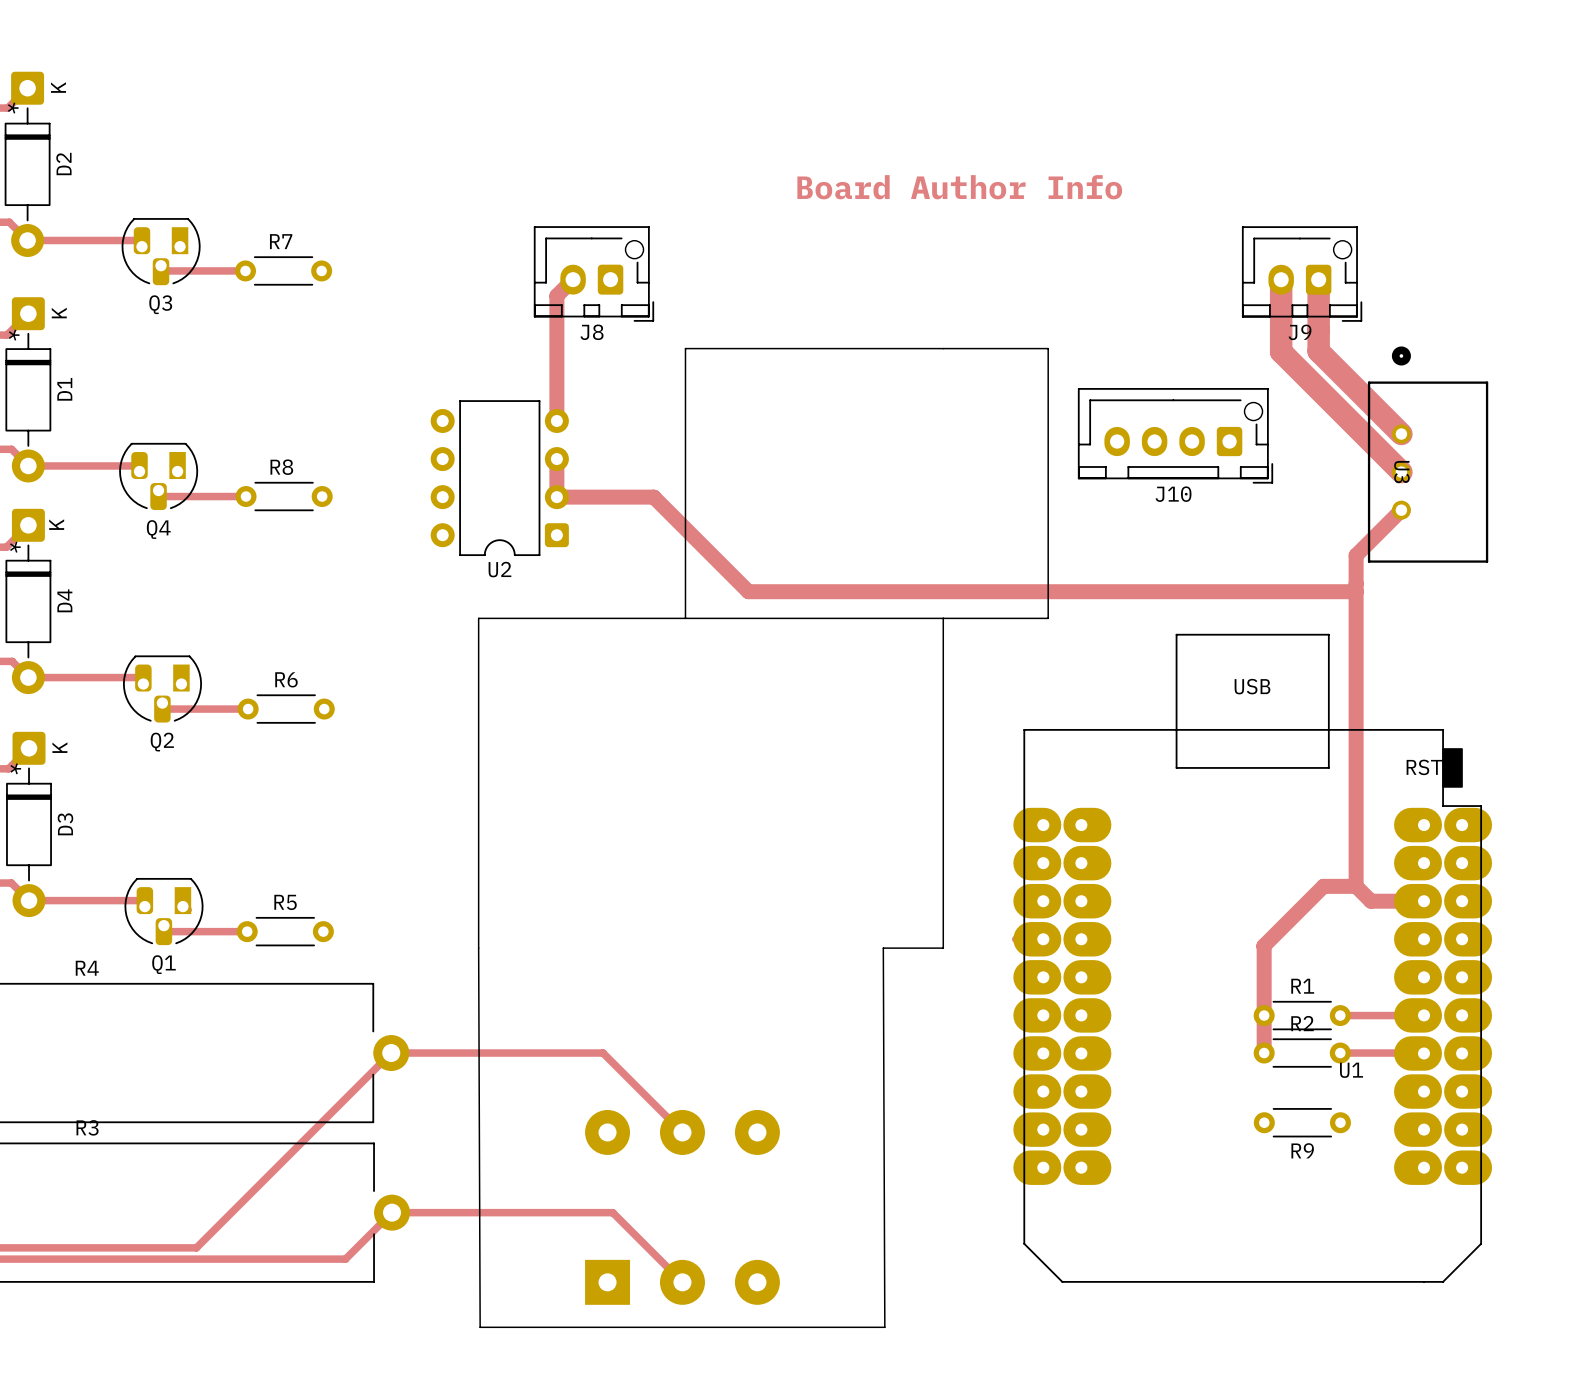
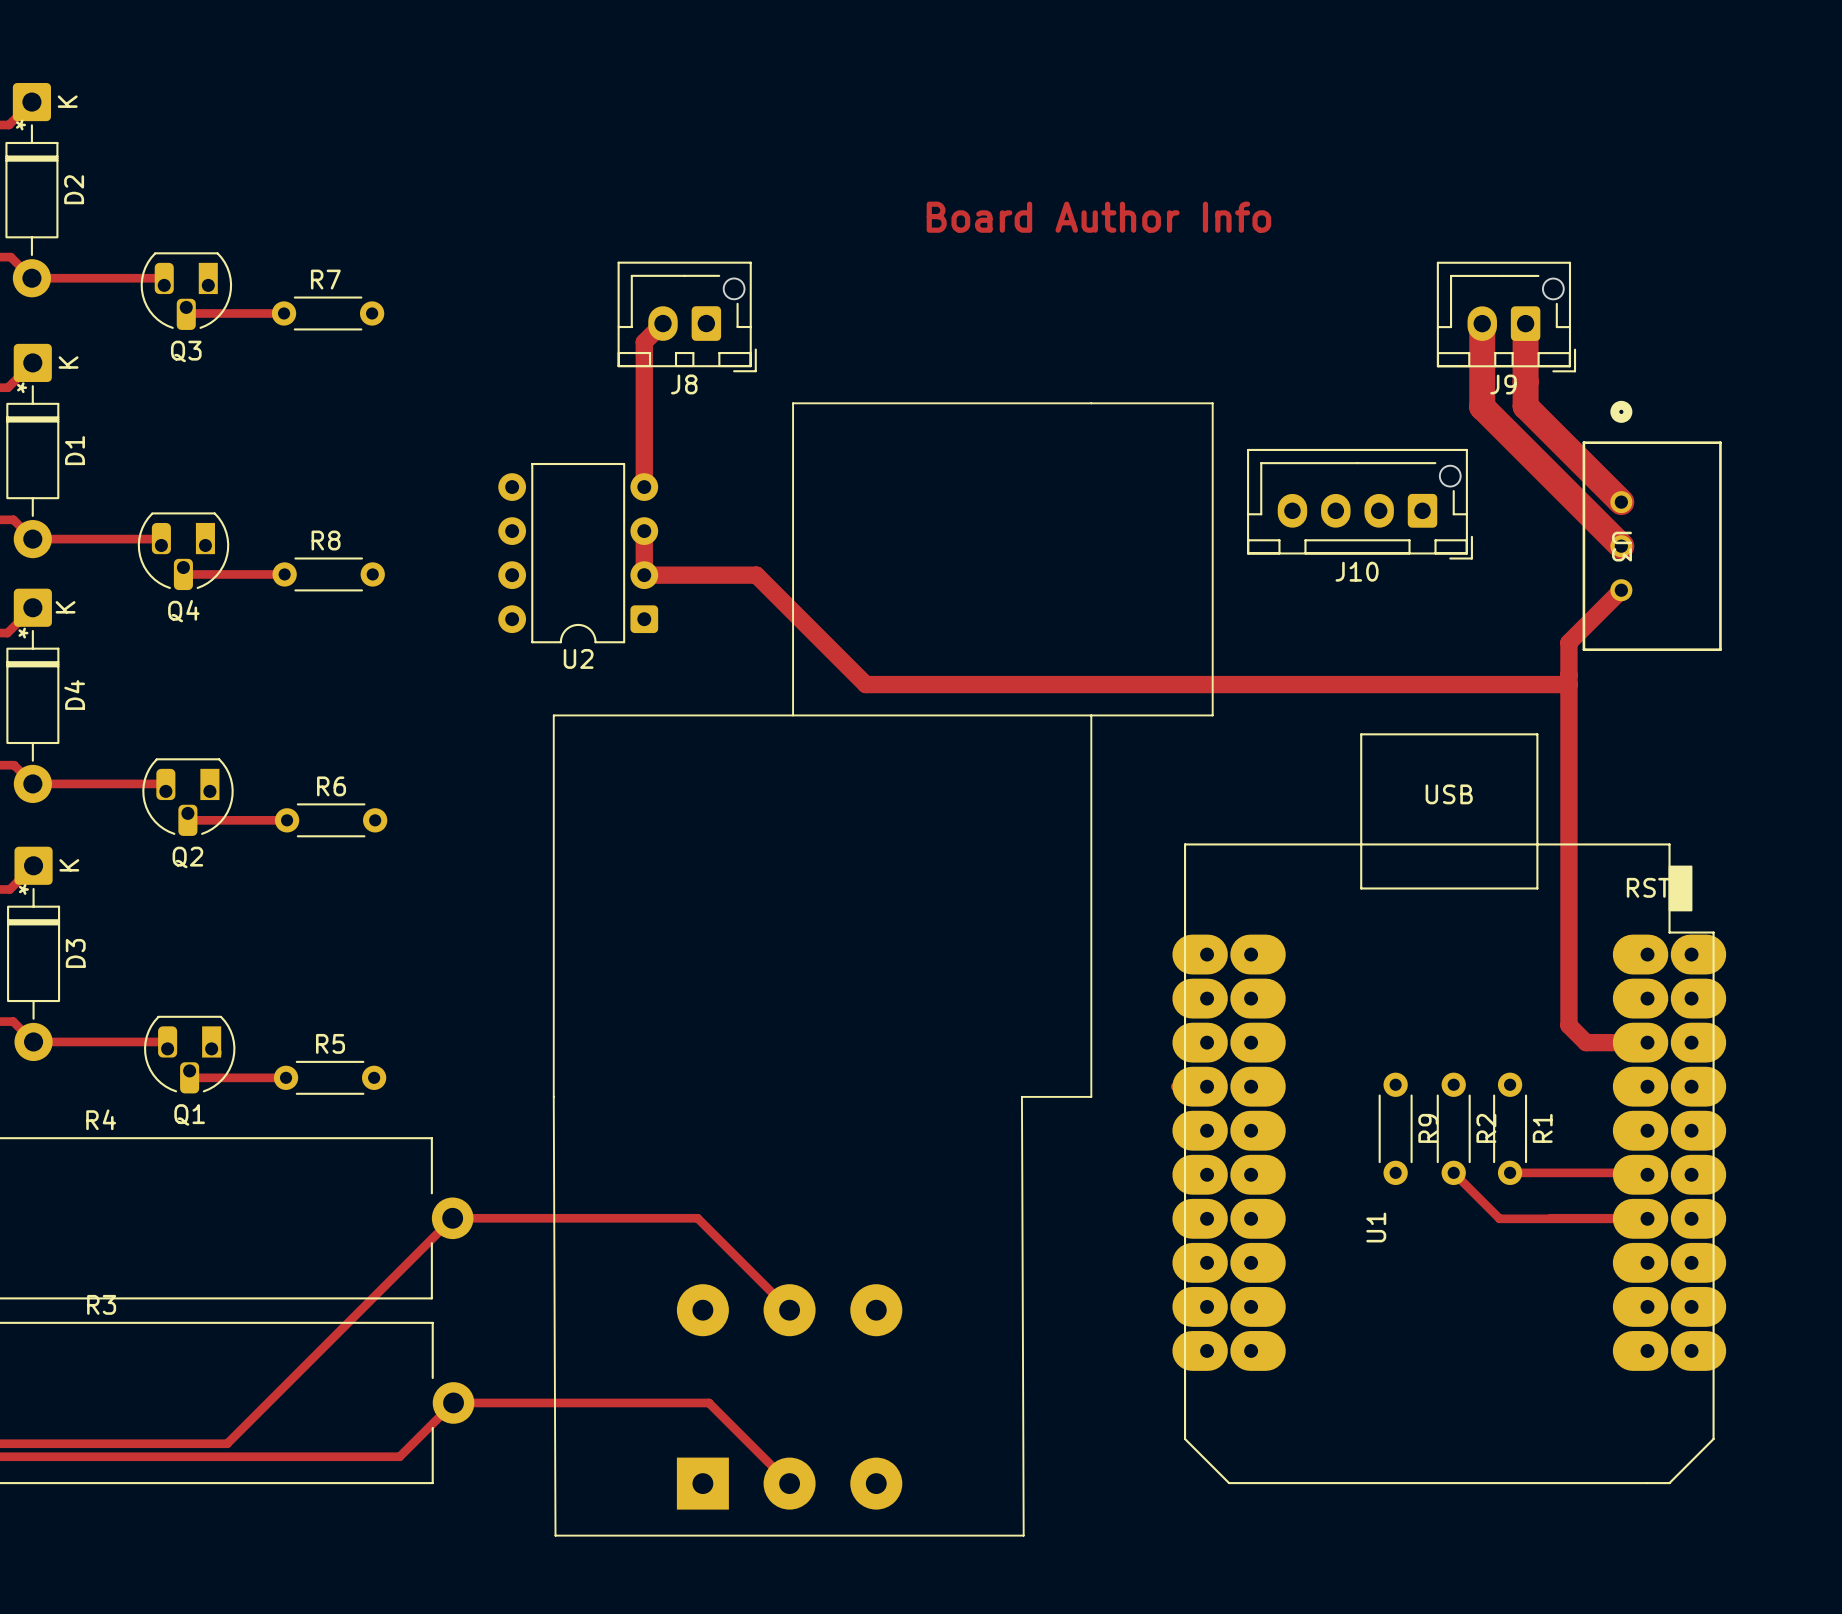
track: (1356, 886) (1323, 886) (1263, 946) (1264, 1053) -> none
track: none -> (1453, 1172) (1499, 1218) (1647, 1218)
R1 rotation: 0° (1302, 1015) -> 90° clockwise (1510, 1128)
track: (1340, 1015) (1423, 1015) -> (1510, 1172) (1645, 1172) (1647, 1174)
R2 rotation: 0° (1302, 1053) -> 90° clockwise (1453, 1128)
R2 position: (1302, 1053) -> (1453, 1128)
U1 name rotation: 0° (1351, 1070) -> 90° counterclockwise (1376, 1227)
U1 name position: U1 (1351, 1070) -> U1 (1376, 1227)
R9 rotation: 0° (1302, 1122) -> 90° clockwise (1395, 1128)
R9 position: (1302, 1122) -> (1395, 1128)
R9 name position: R9 (1302, 1150) -> R9 (1428, 1128)

